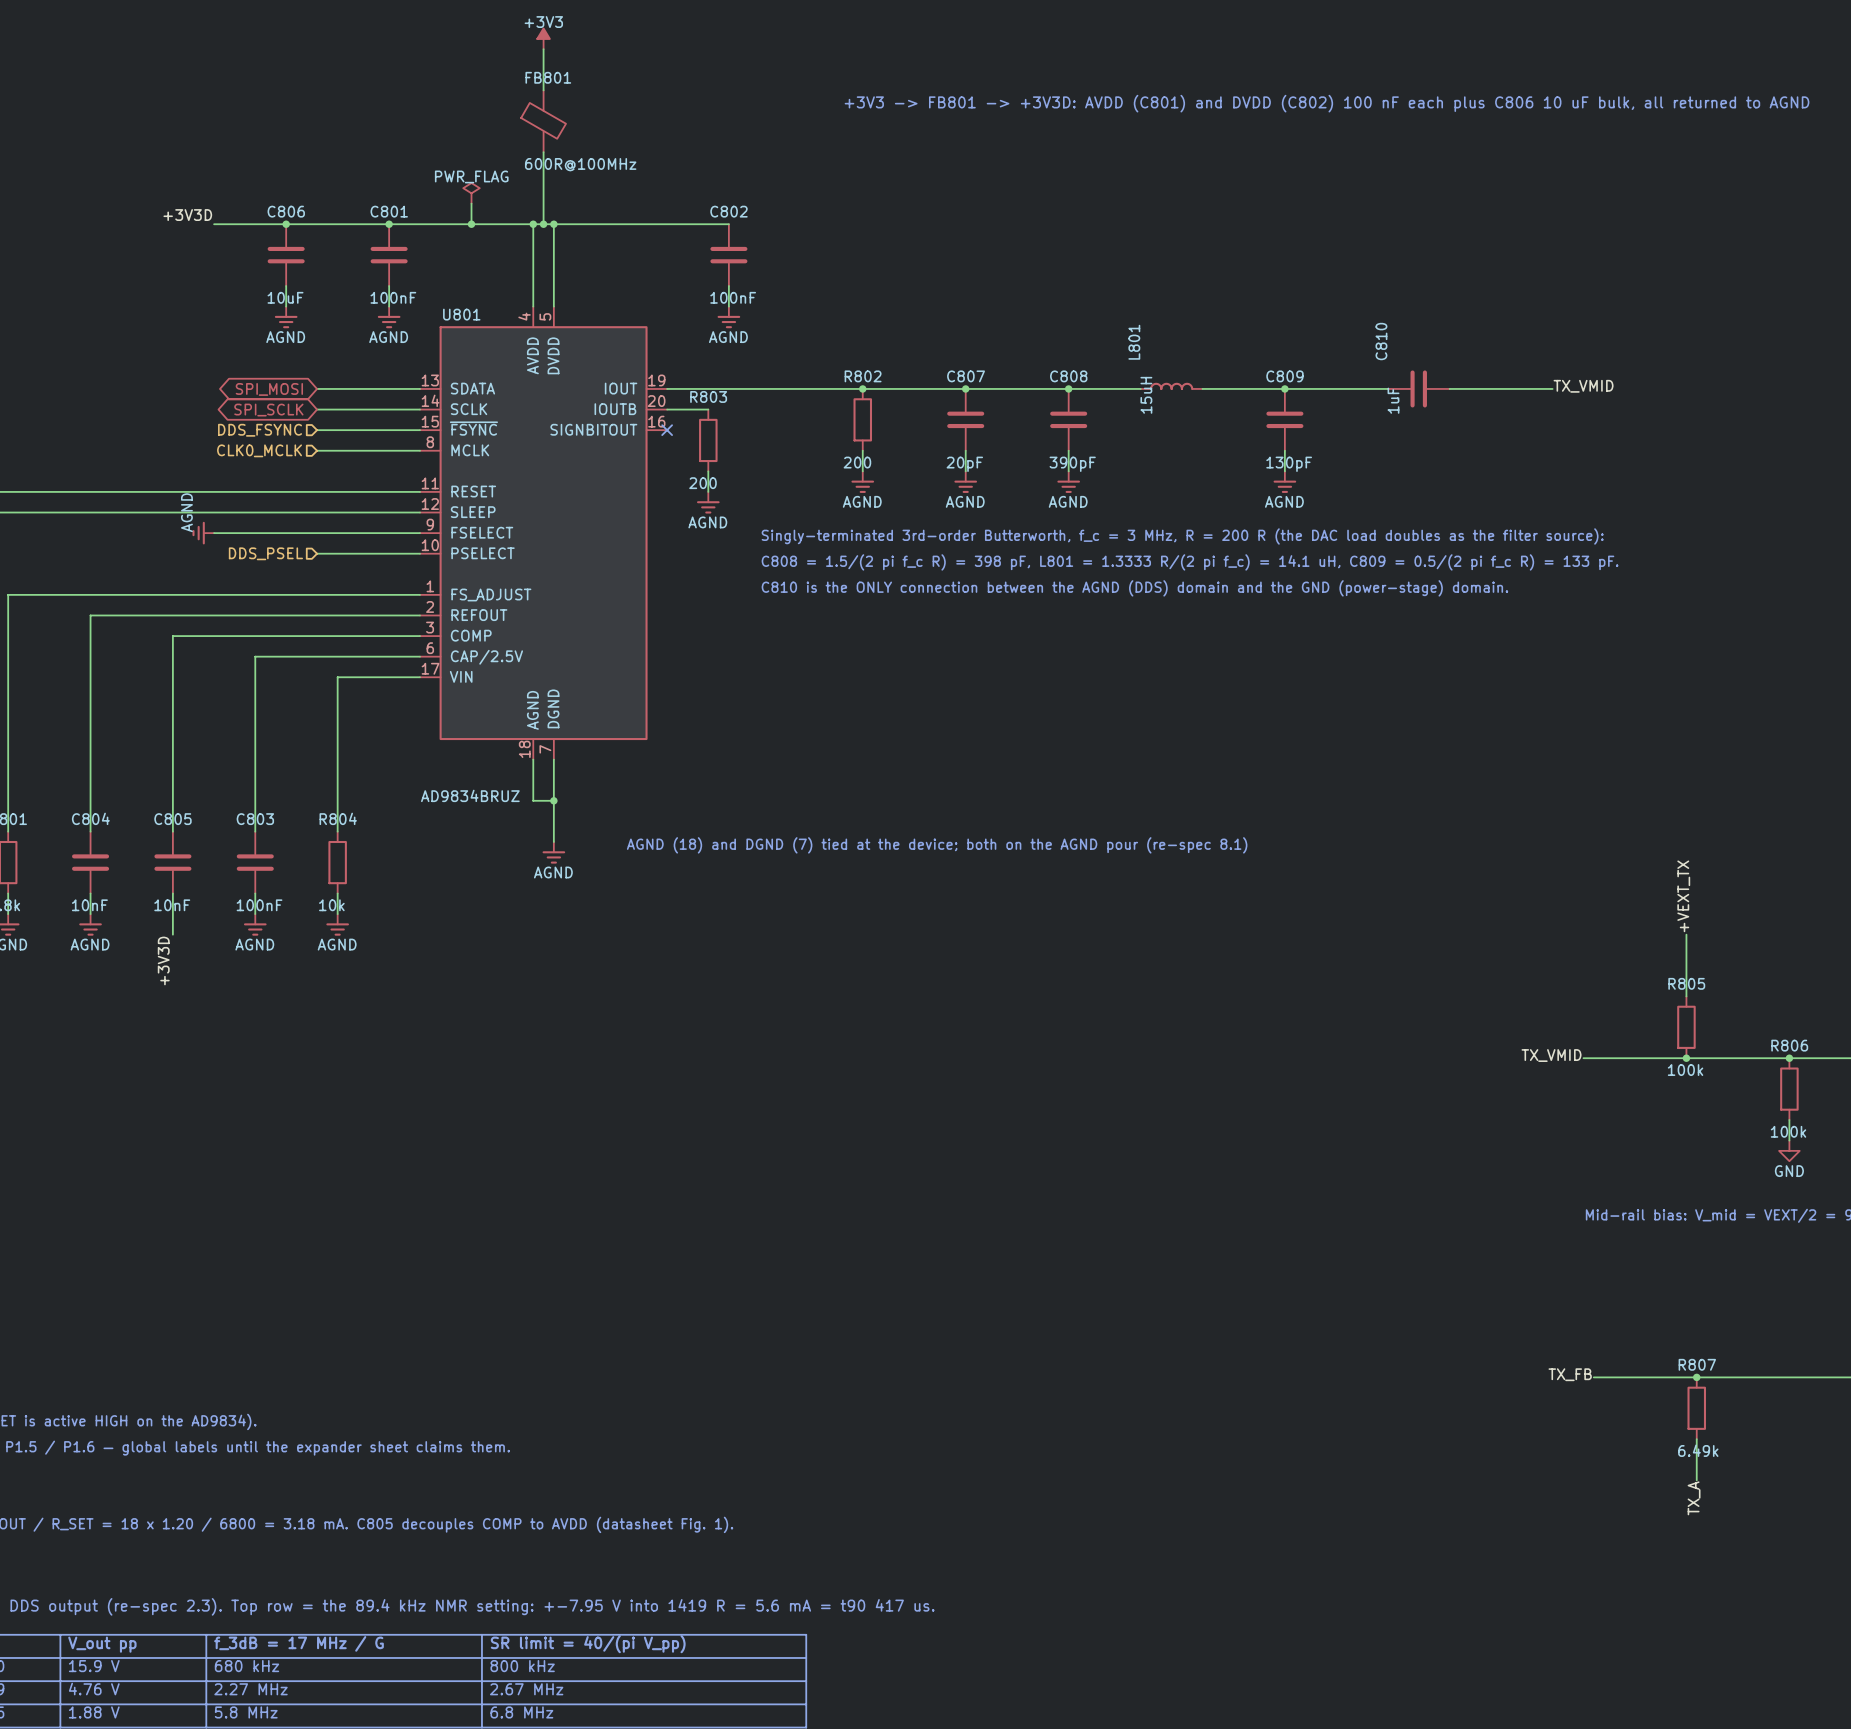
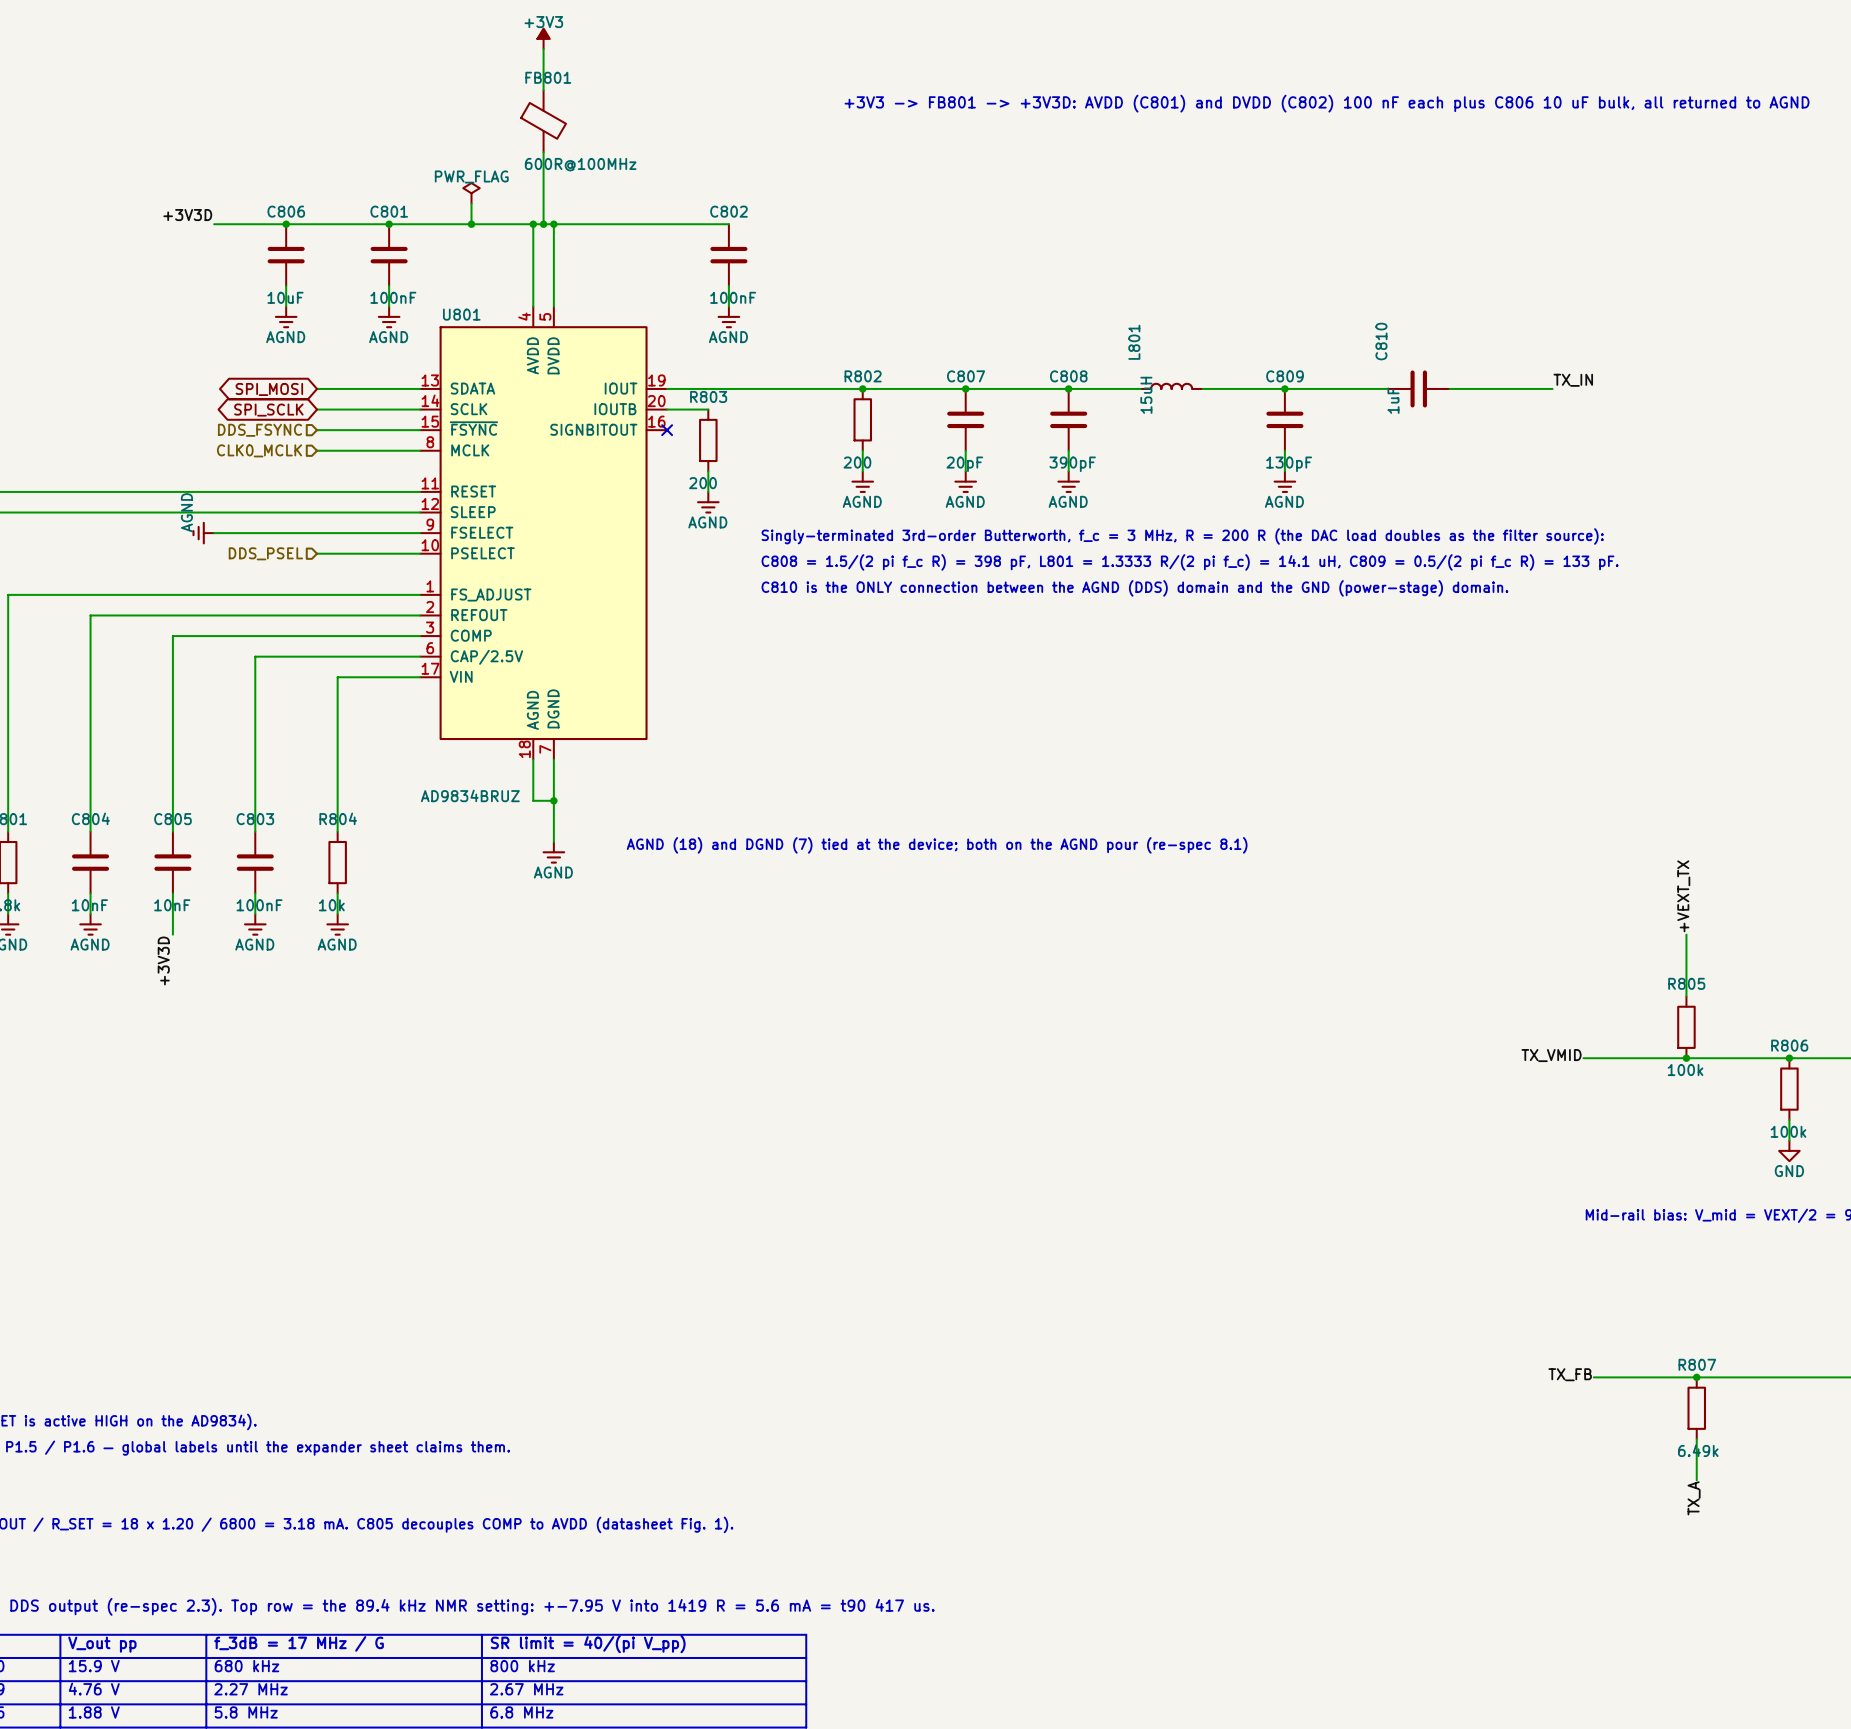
label: TX_VMID (1583, 386) -> TX_IN (1573, 380)

